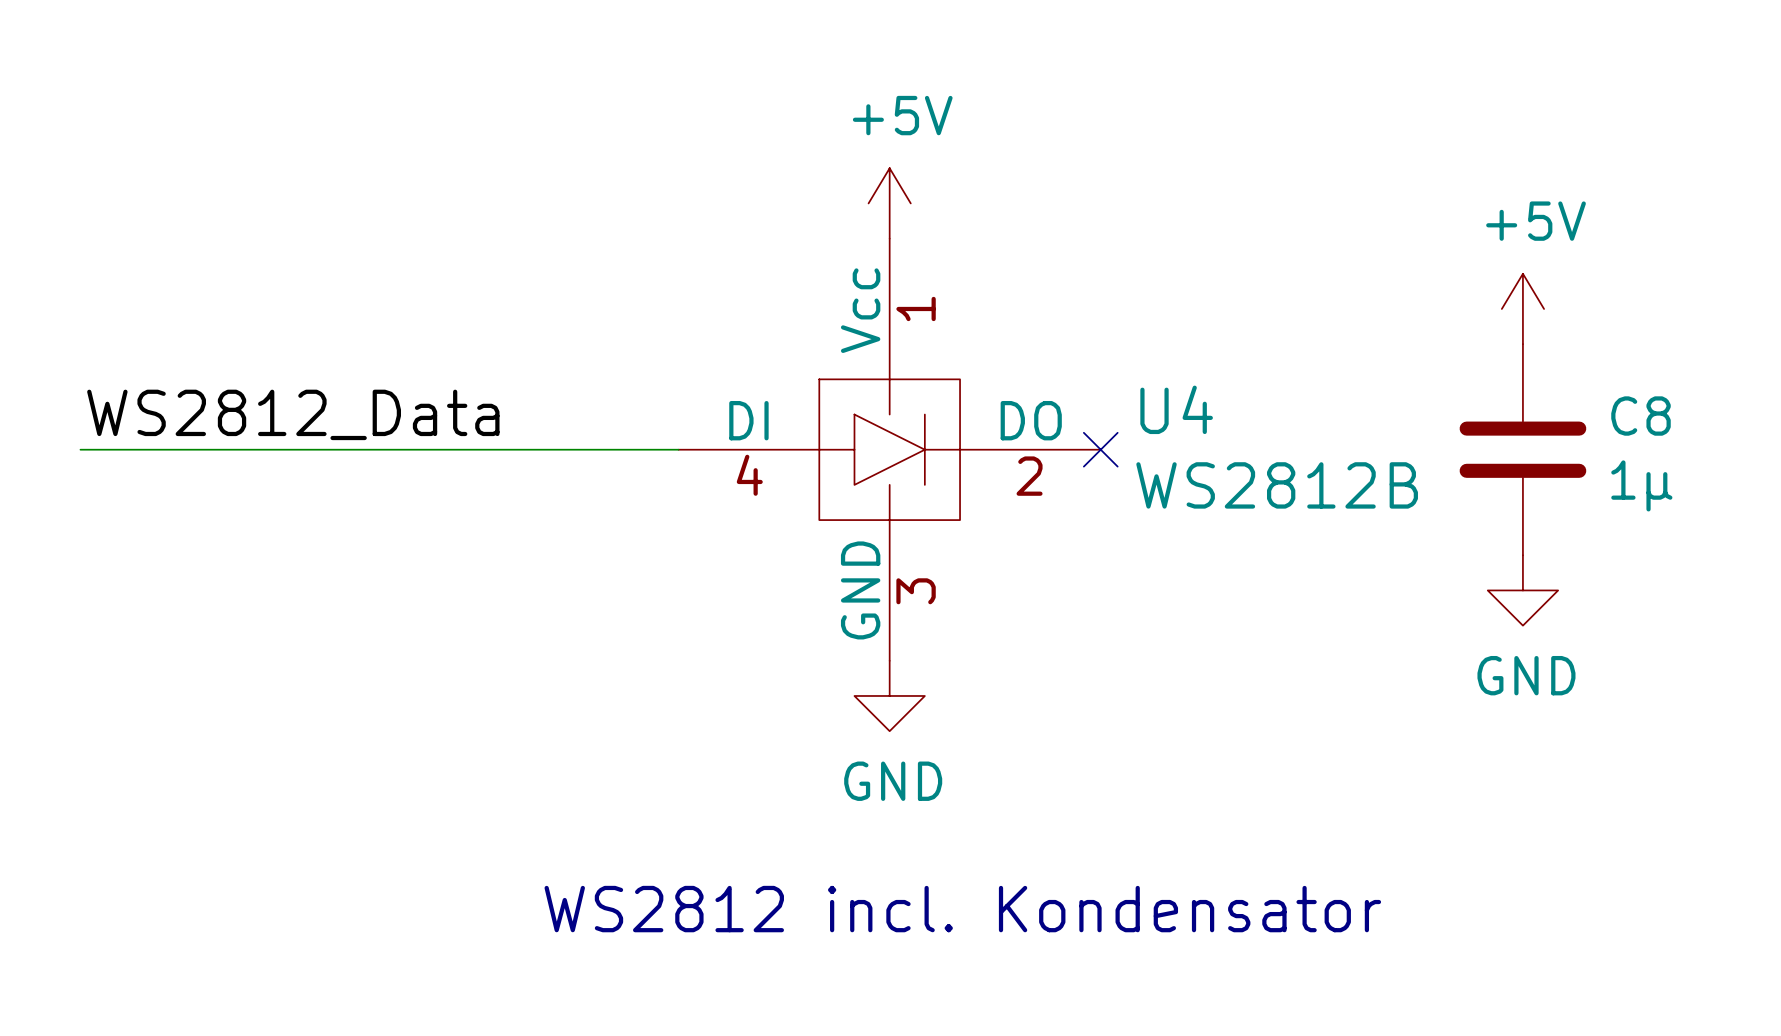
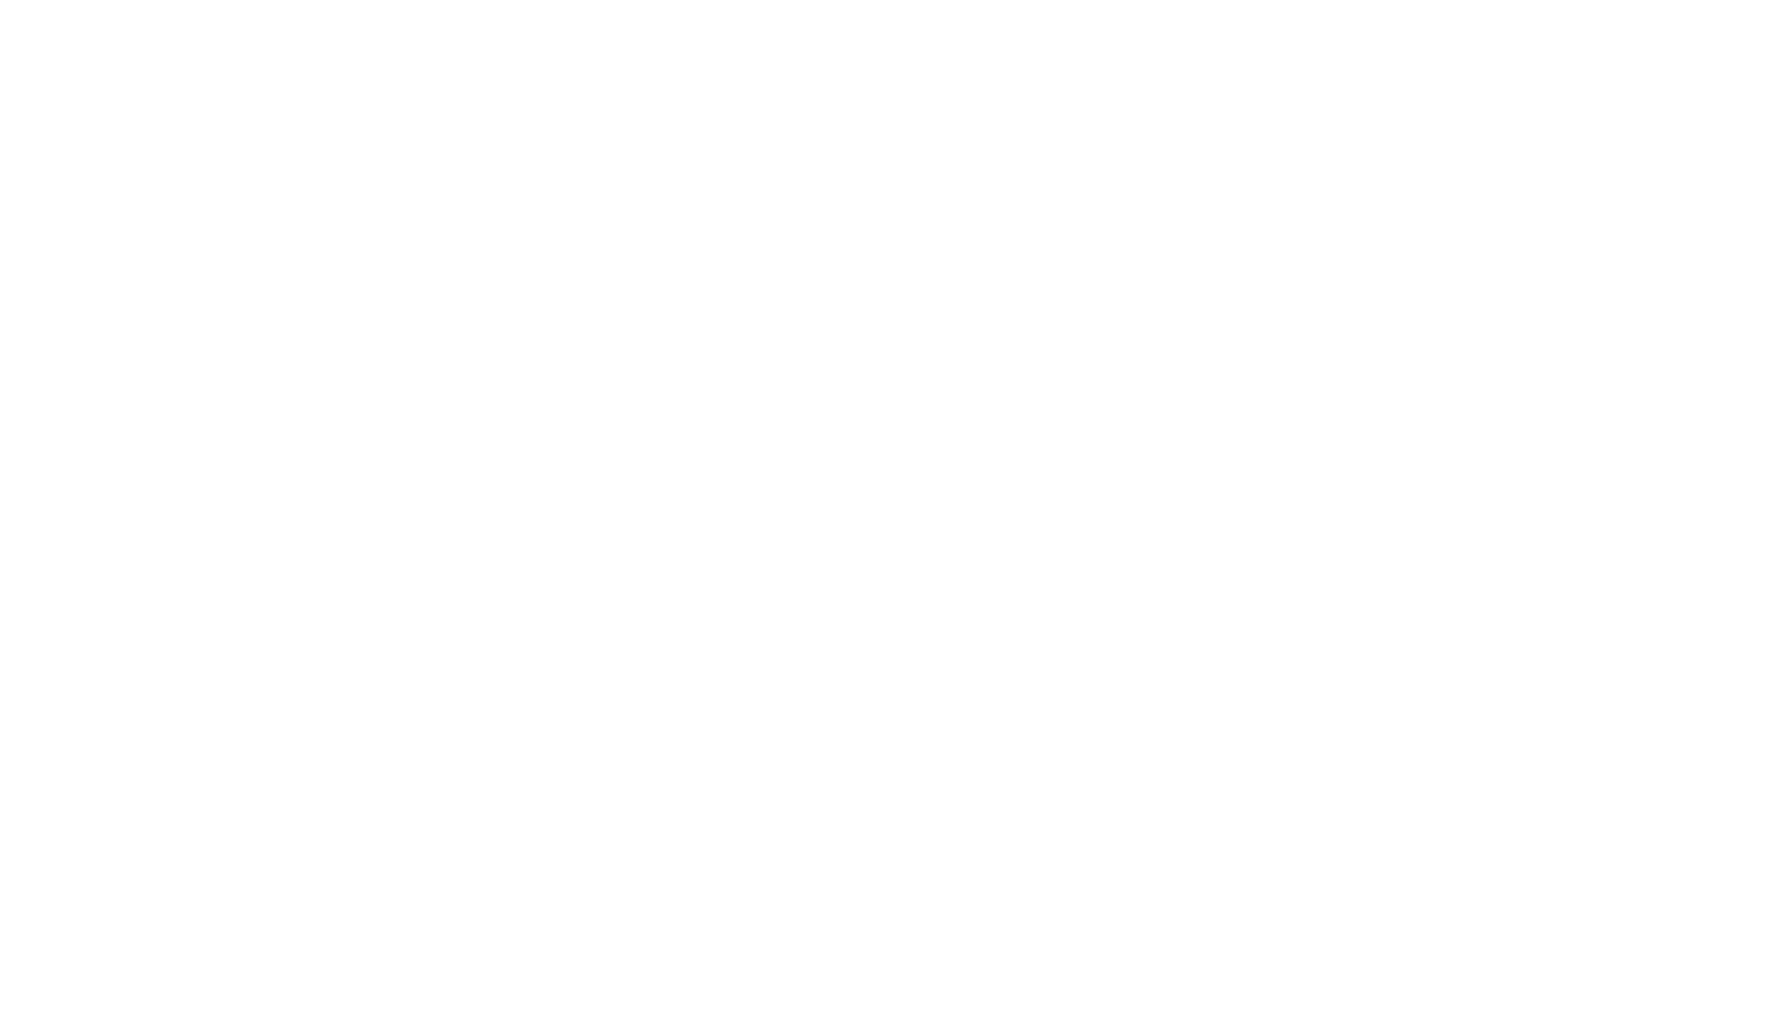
power symbol: +5V (889, 203) -> none
power symbol: +5V (1522, 308) -> none
label: WS2812_Data (293, 414) -> none
wire: (80, 449) (678, 449) -> none
U4: WS2812B (889, 449) -> none
no-connect mark: (1100, 449) -> none
C8: 1µ (1522, 449) -> none
power symbol: GND (1522, 590) -> none
power symbol: GND (889, 695) -> none
text: WS2812 incl. Kondensator (962, 909) -> none

